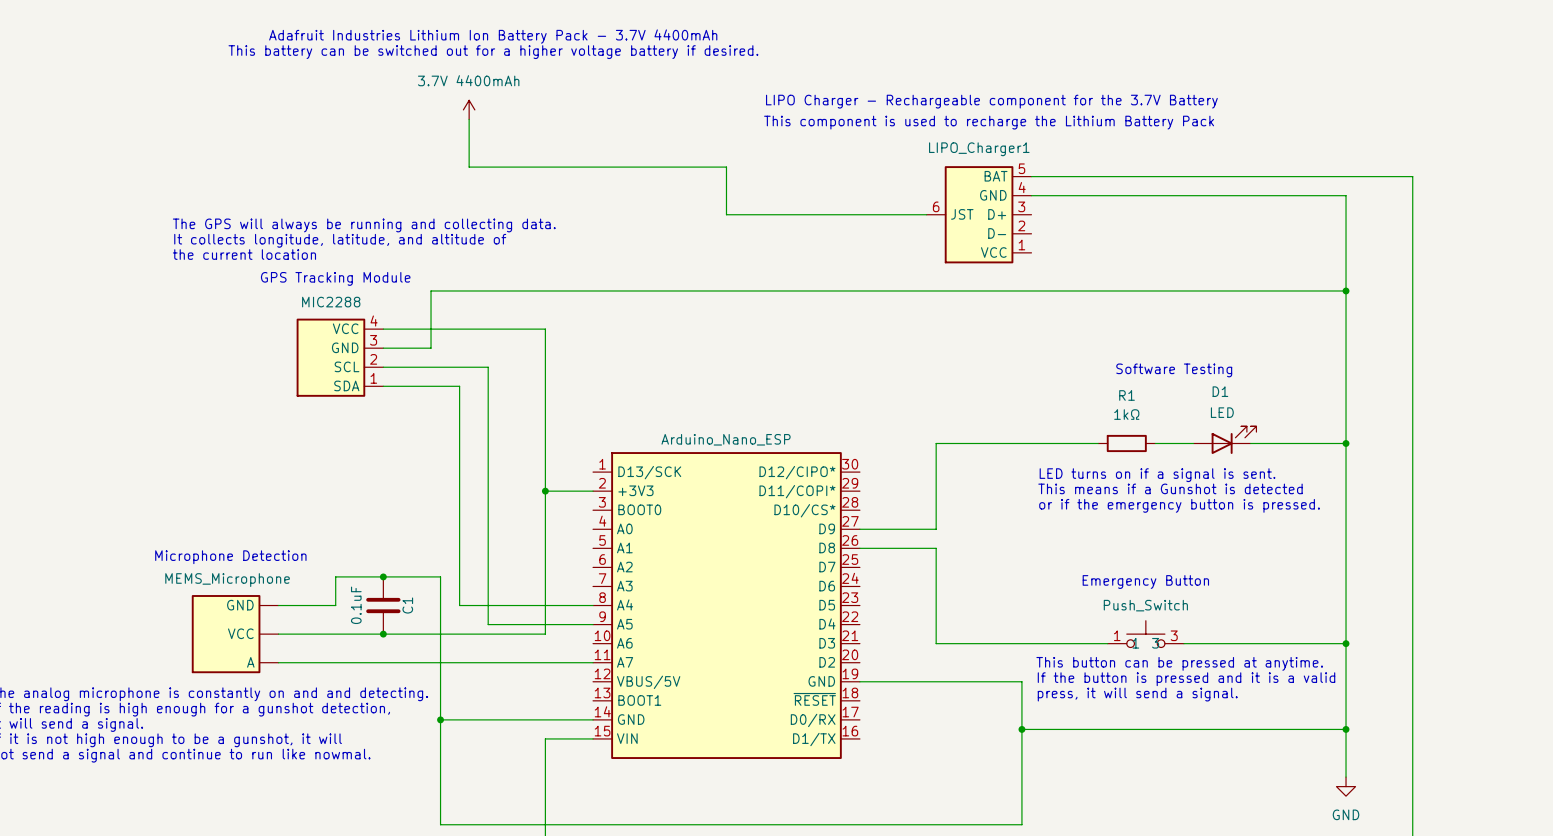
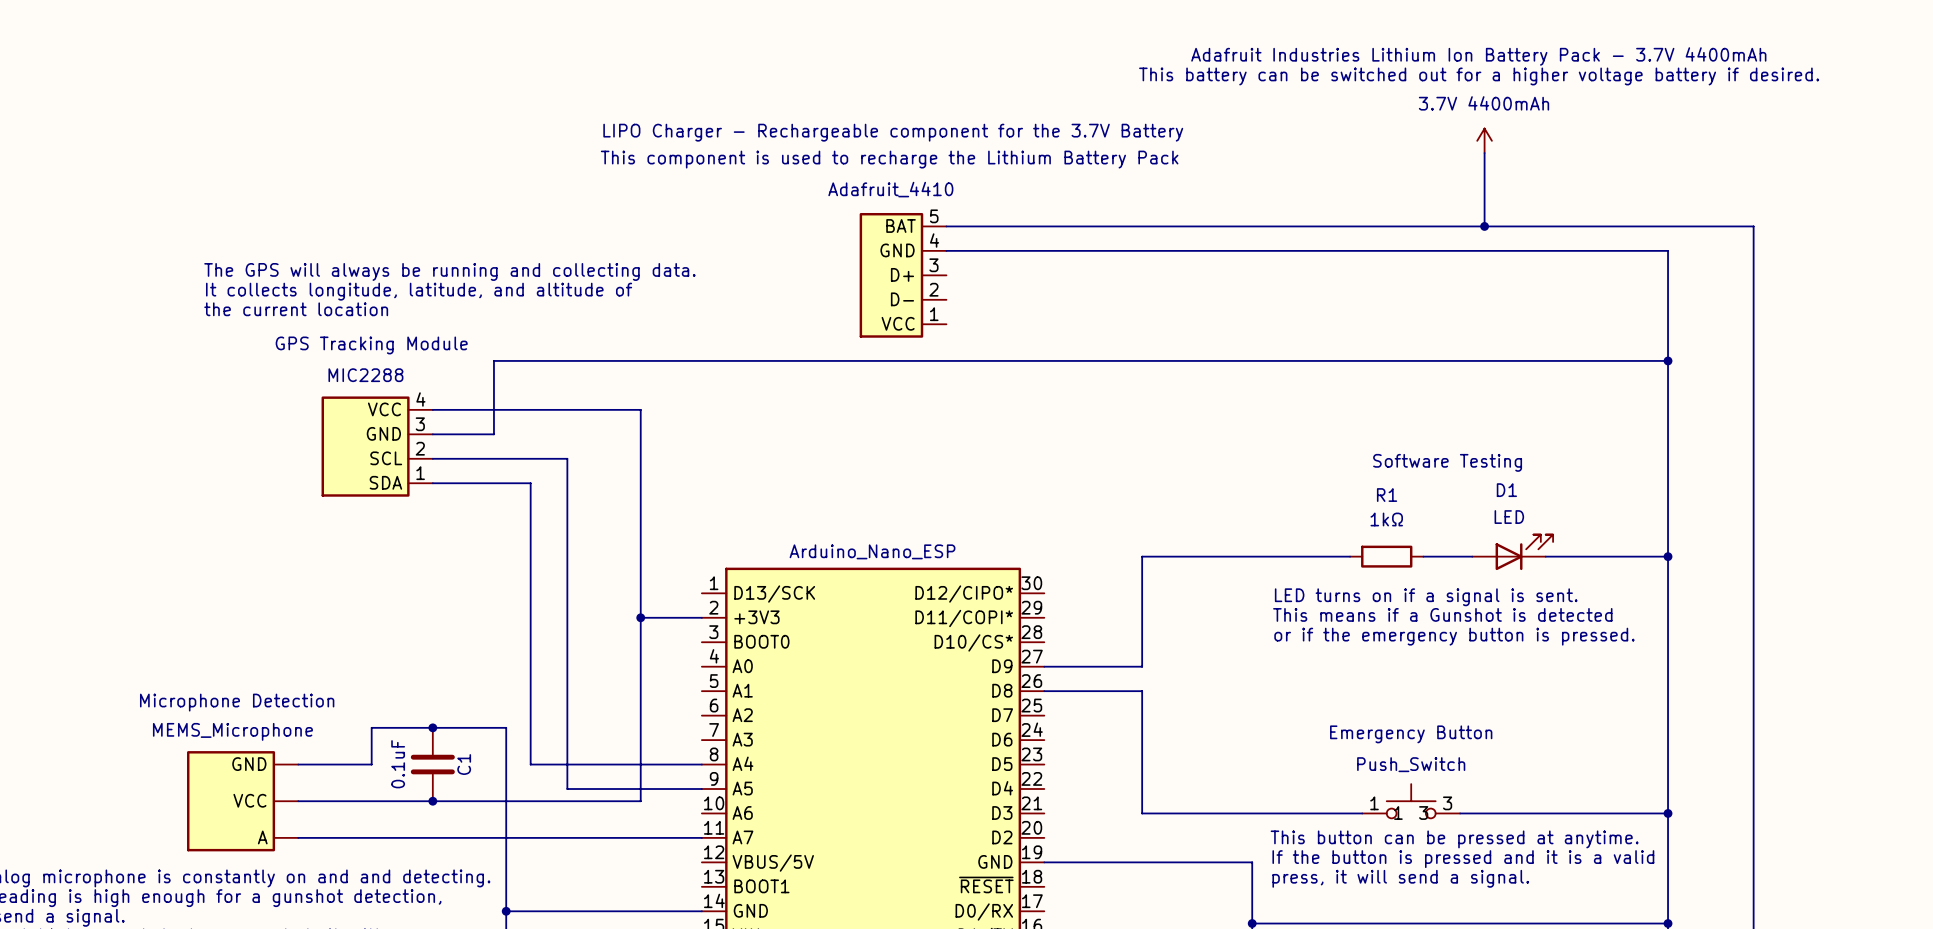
text: Adafruit Industries Lithium Ion Battery Pack - 3.7V 4400mAh (493, 36) -> none
text: This battery can be switched out for a higher voltage battery if desired. (493, 52) -> none
text: none -> Adafruit Industries Lithium Ion Battery Pack - 3.7V 4400mAh (1478, 56)
text: none -> This battery can be switched out for a higher voltage battery if desired. (1479, 76)
text: LIPO Charger - Rechargeable component for the 3.7V Battery (991, 101) -> none
power symbol: 3.7V 4400mAh (469, 109) -> none
text: none -> LIPO Charger - Rechargeable component for the 3.7V Battery (893, 132)
wire: (469, 119) (469, 167) (726, 167) (726, 214) (926, 214) -> none
power symbol: none -> 3.7V 4400mAh (1484, 140)
text: This component is used to recharge the Lithium Battery Pack (989, 122) -> none
wire: none -> (1484, 153) (1484, 226)
text: none -> This component is used to recharge the Lithium Battery Pack (889, 159)
wire: (1031, 176) (1412, 176) (1412, 186) -> (946, 226) (1753, 226)
junction: none -> (1484, 226)
wire: (1031, 195) (1346, 195) (1346, 205) -> (946, 250) (1668, 250)
LIPO_Charger1: (979, 214) -> none
Adafruit_4410: none -> (903, 275)
text position: The GPS will always be running and collecting data. (364, 225) -> The GPS will always be running and collecting data. (449, 271)
text position: It collects longitude, latitude, and altitude of (340, 240) -> It collects longitude, latitude, and altitude of (419, 291)
text position: the current location (244, 254) -> the current location (296, 309)

